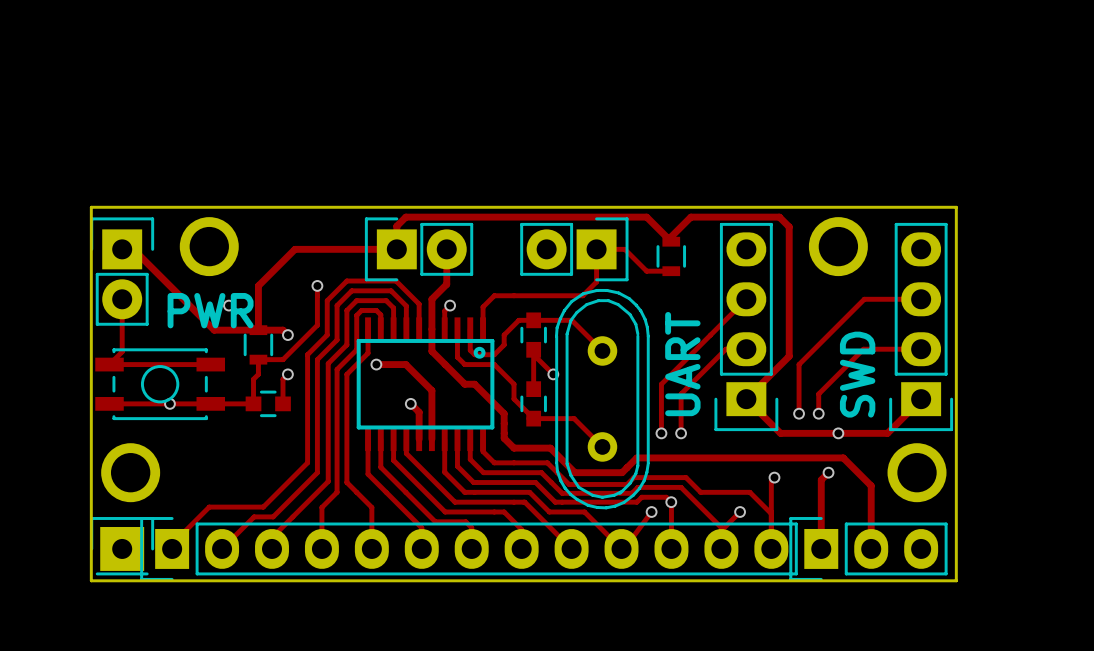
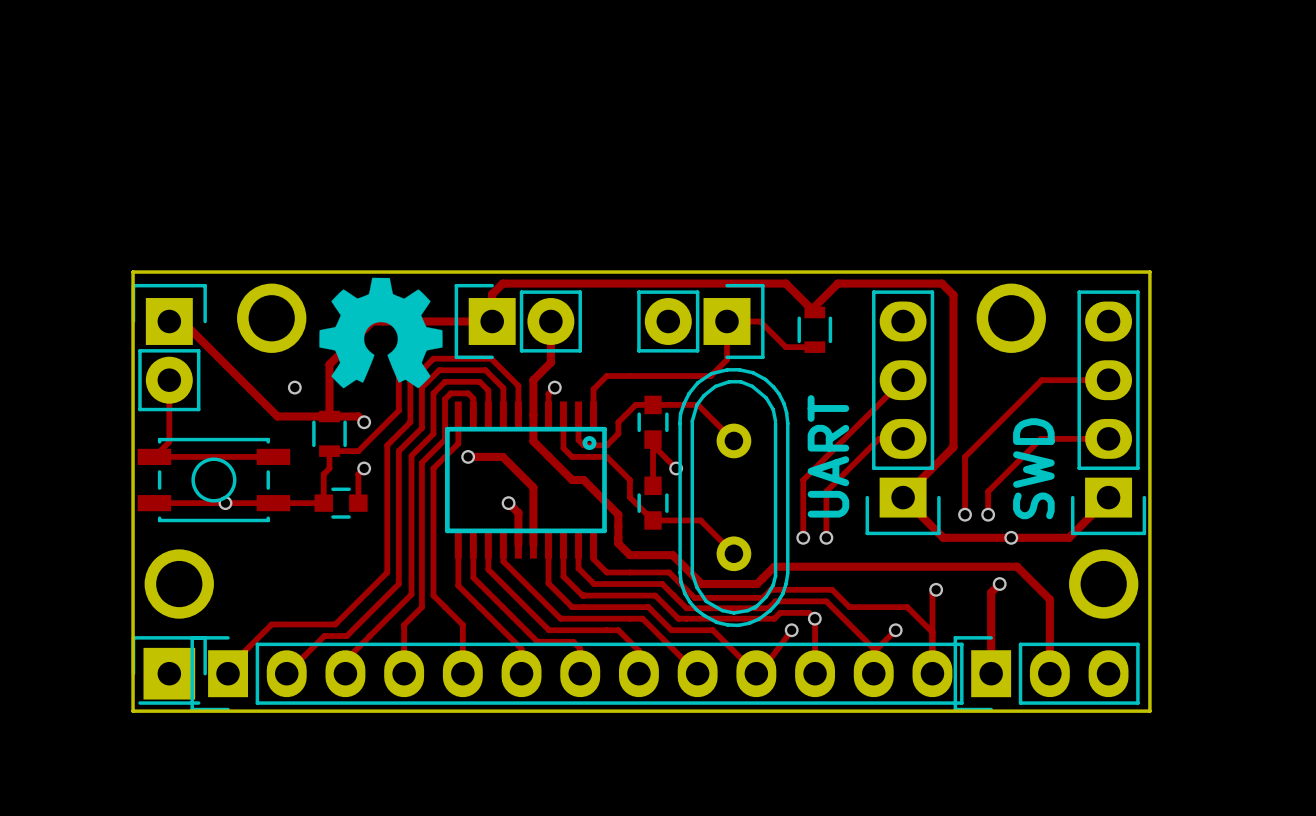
drawing: none -> [319, 277, 443, 389]
text: PWR (210, 310) -> none

